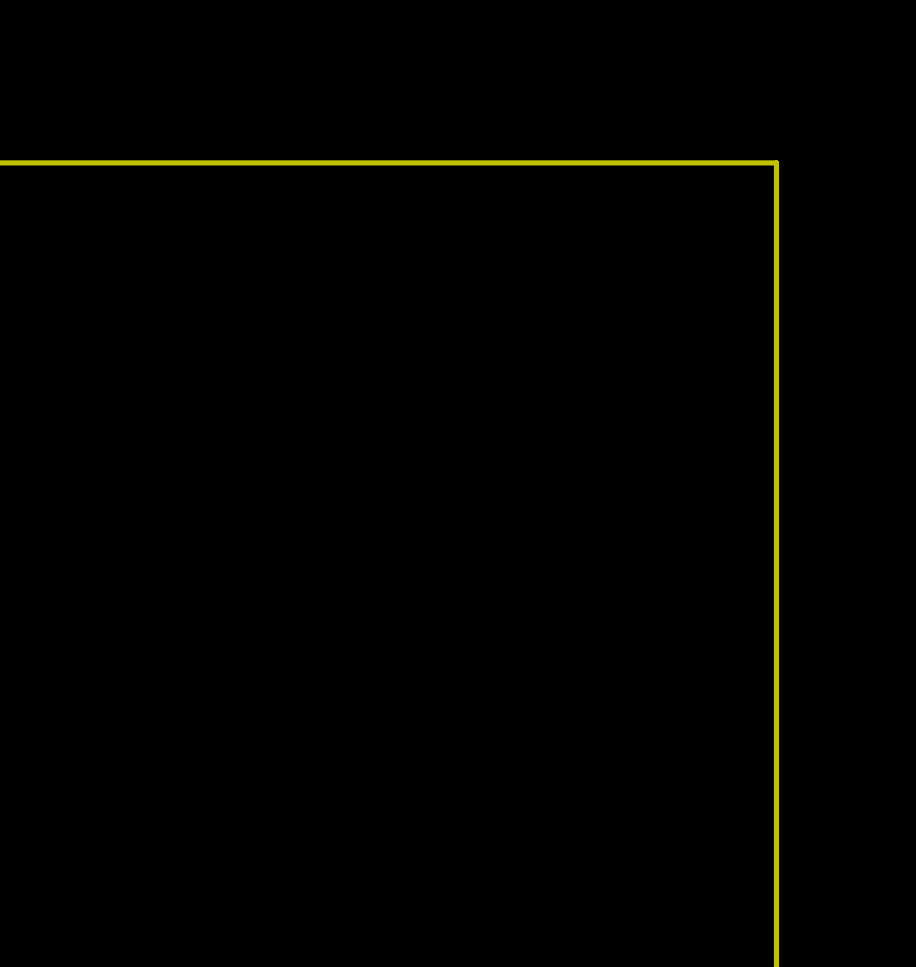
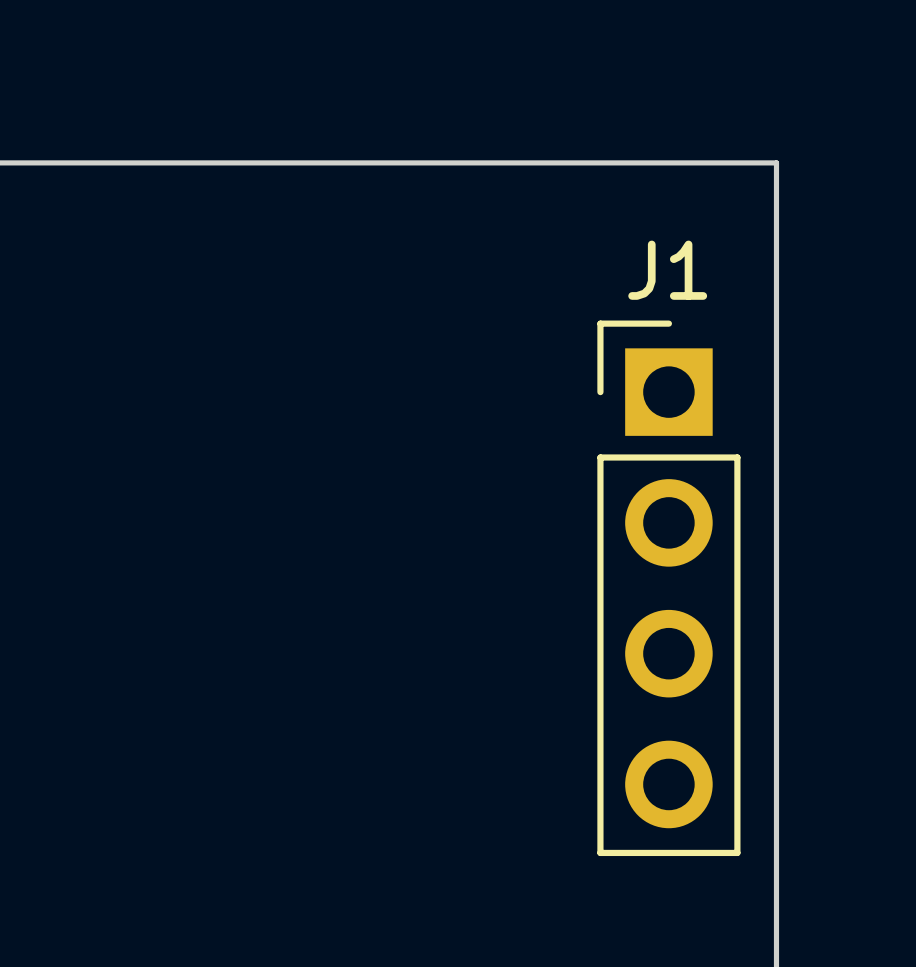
J1: none -> (668, 588)

